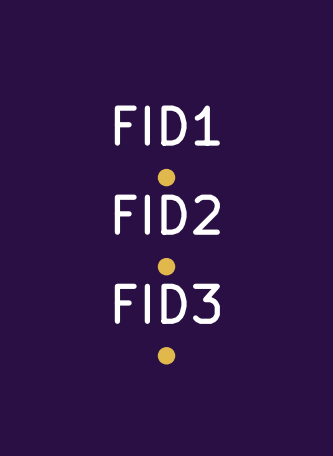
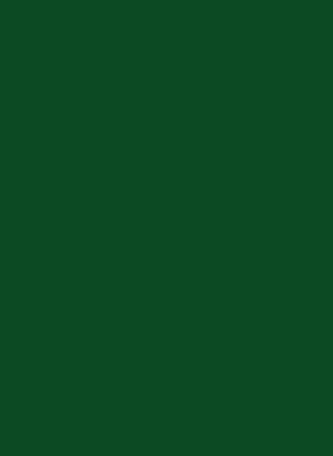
FID1: (166, 177) -> none
FID2: (166, 266) -> none
FID3: (166, 355) -> none

